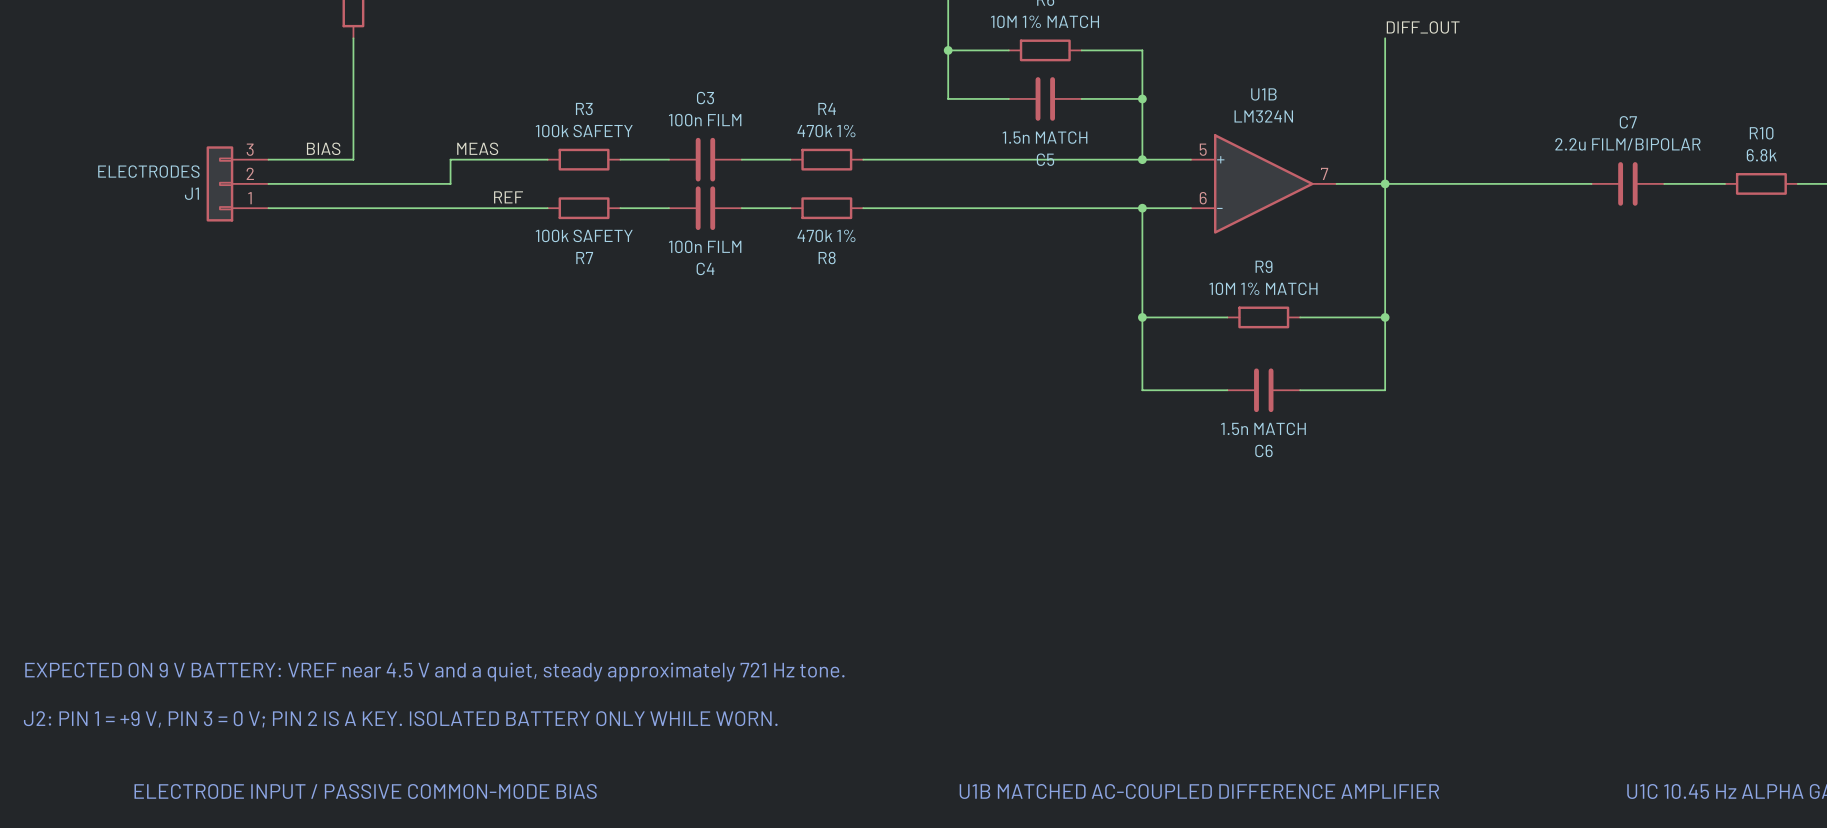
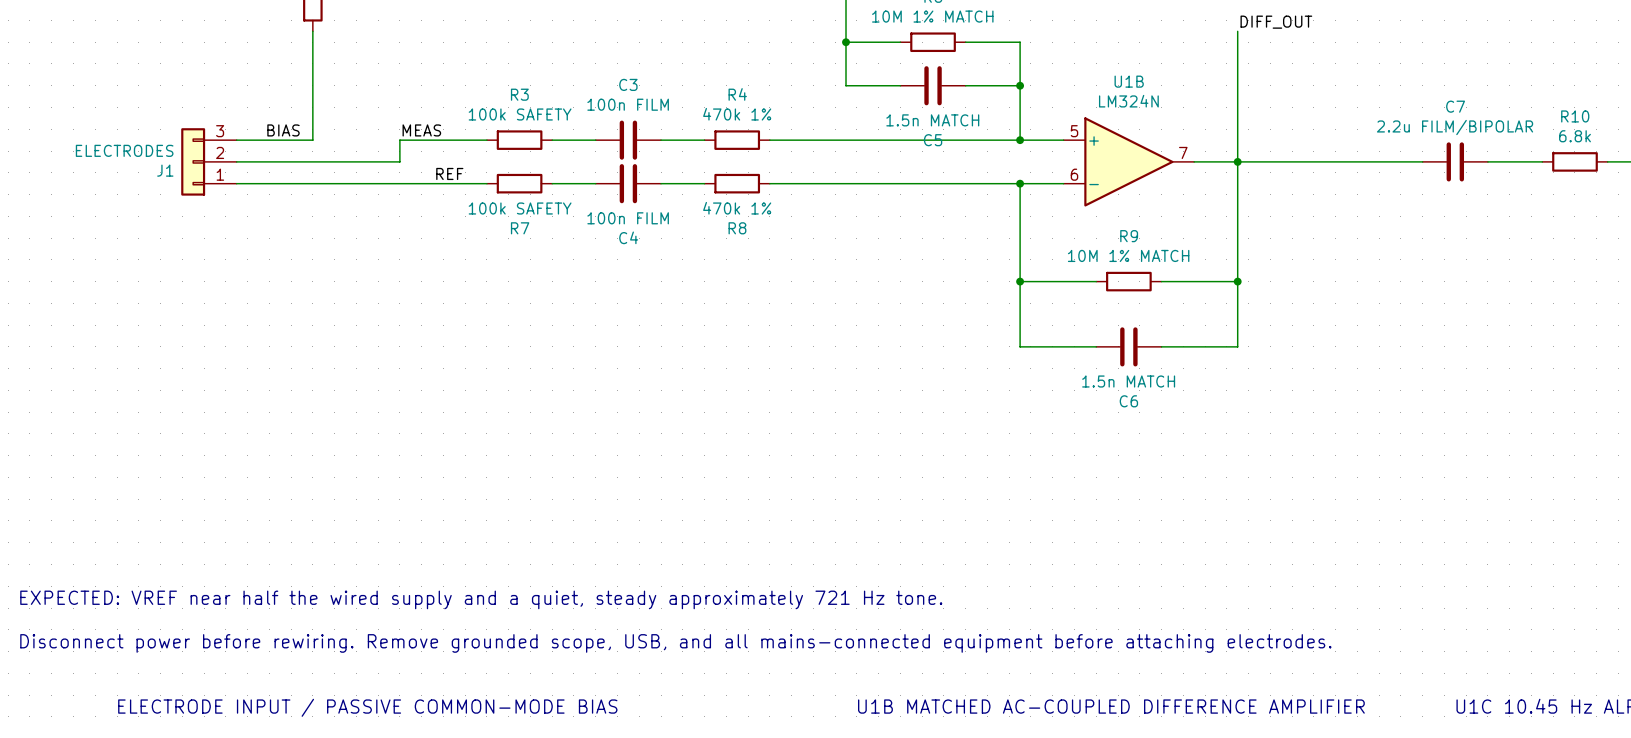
text: EXPECTED ON 9 V BATTERY: VREF near 4.5 V and a quiet, steady approximately 721 Hz tone. (434, 672) -> EXPECTED: VREF near half the wired supply and a quiet, steady approximately 721 Hz tone. (481, 599)
text: J2: PIN 1 = +9 V, PIN 3 = 0 V; PIN 2 IS A KEY. ISOLATED BATTERY ONLY WHILE WORN. (400, 719) -> Disconnect power before rewiring. Remove grounded scope, USB, and all mains-connected equipment before attaching electrodes. (675, 643)

